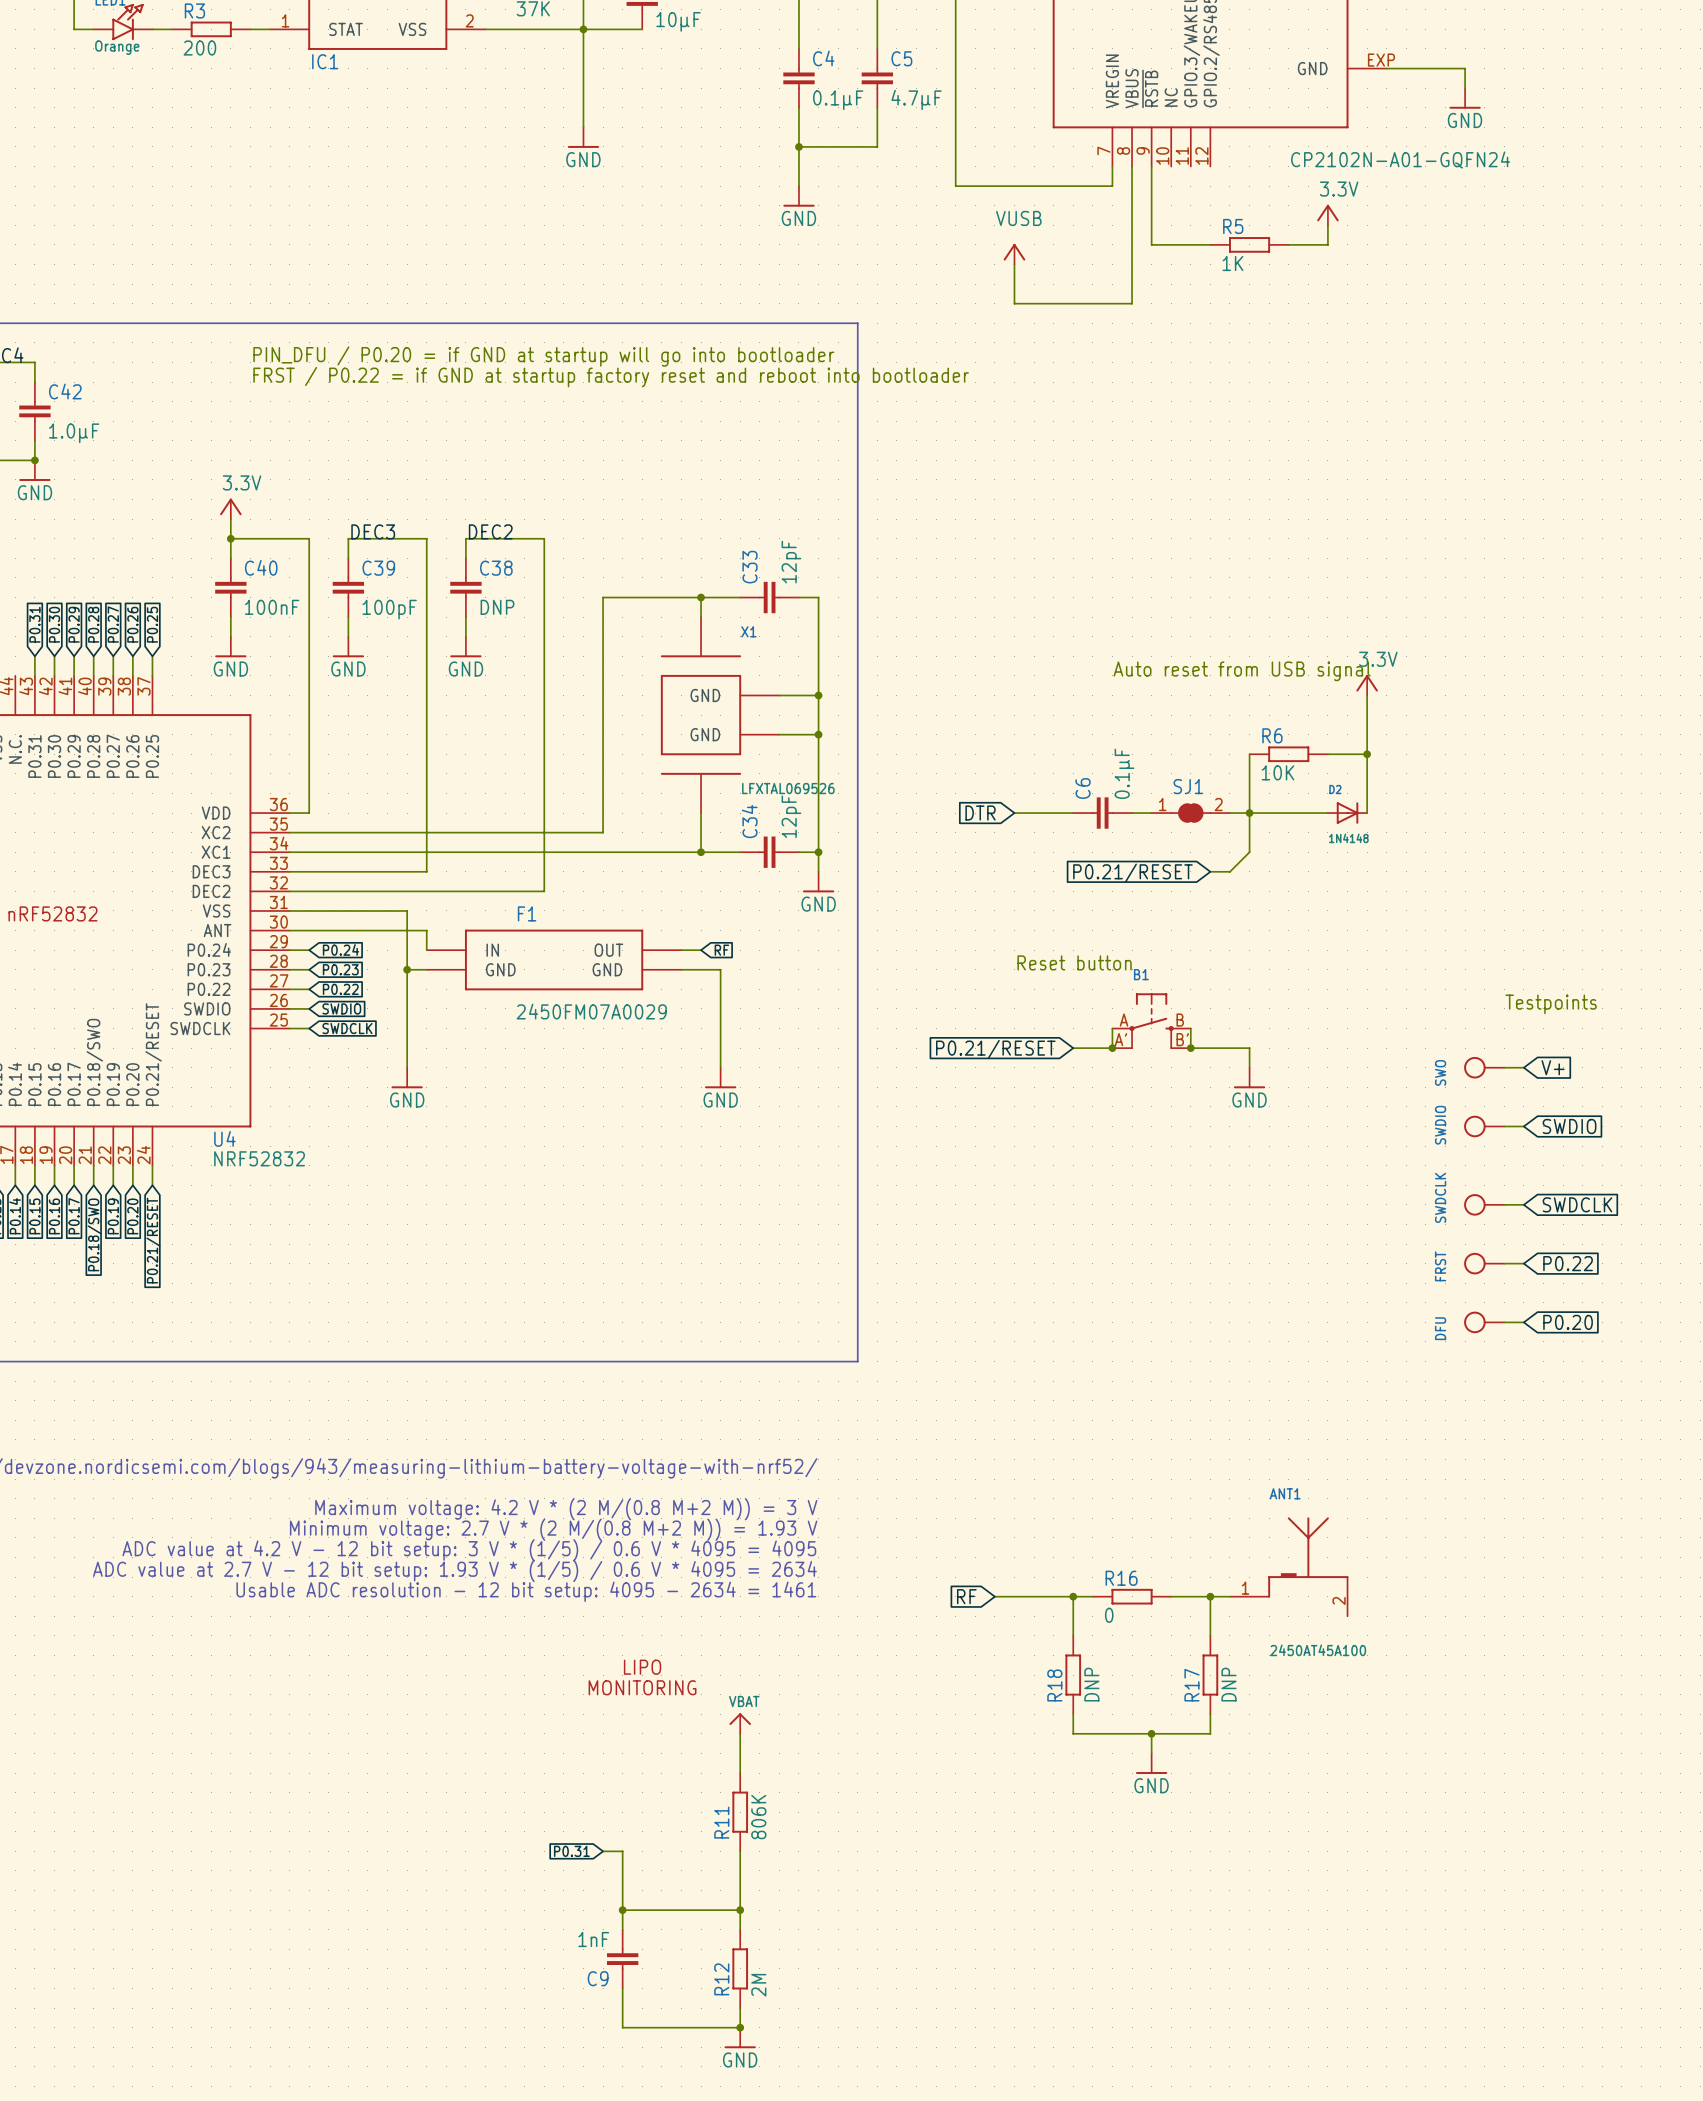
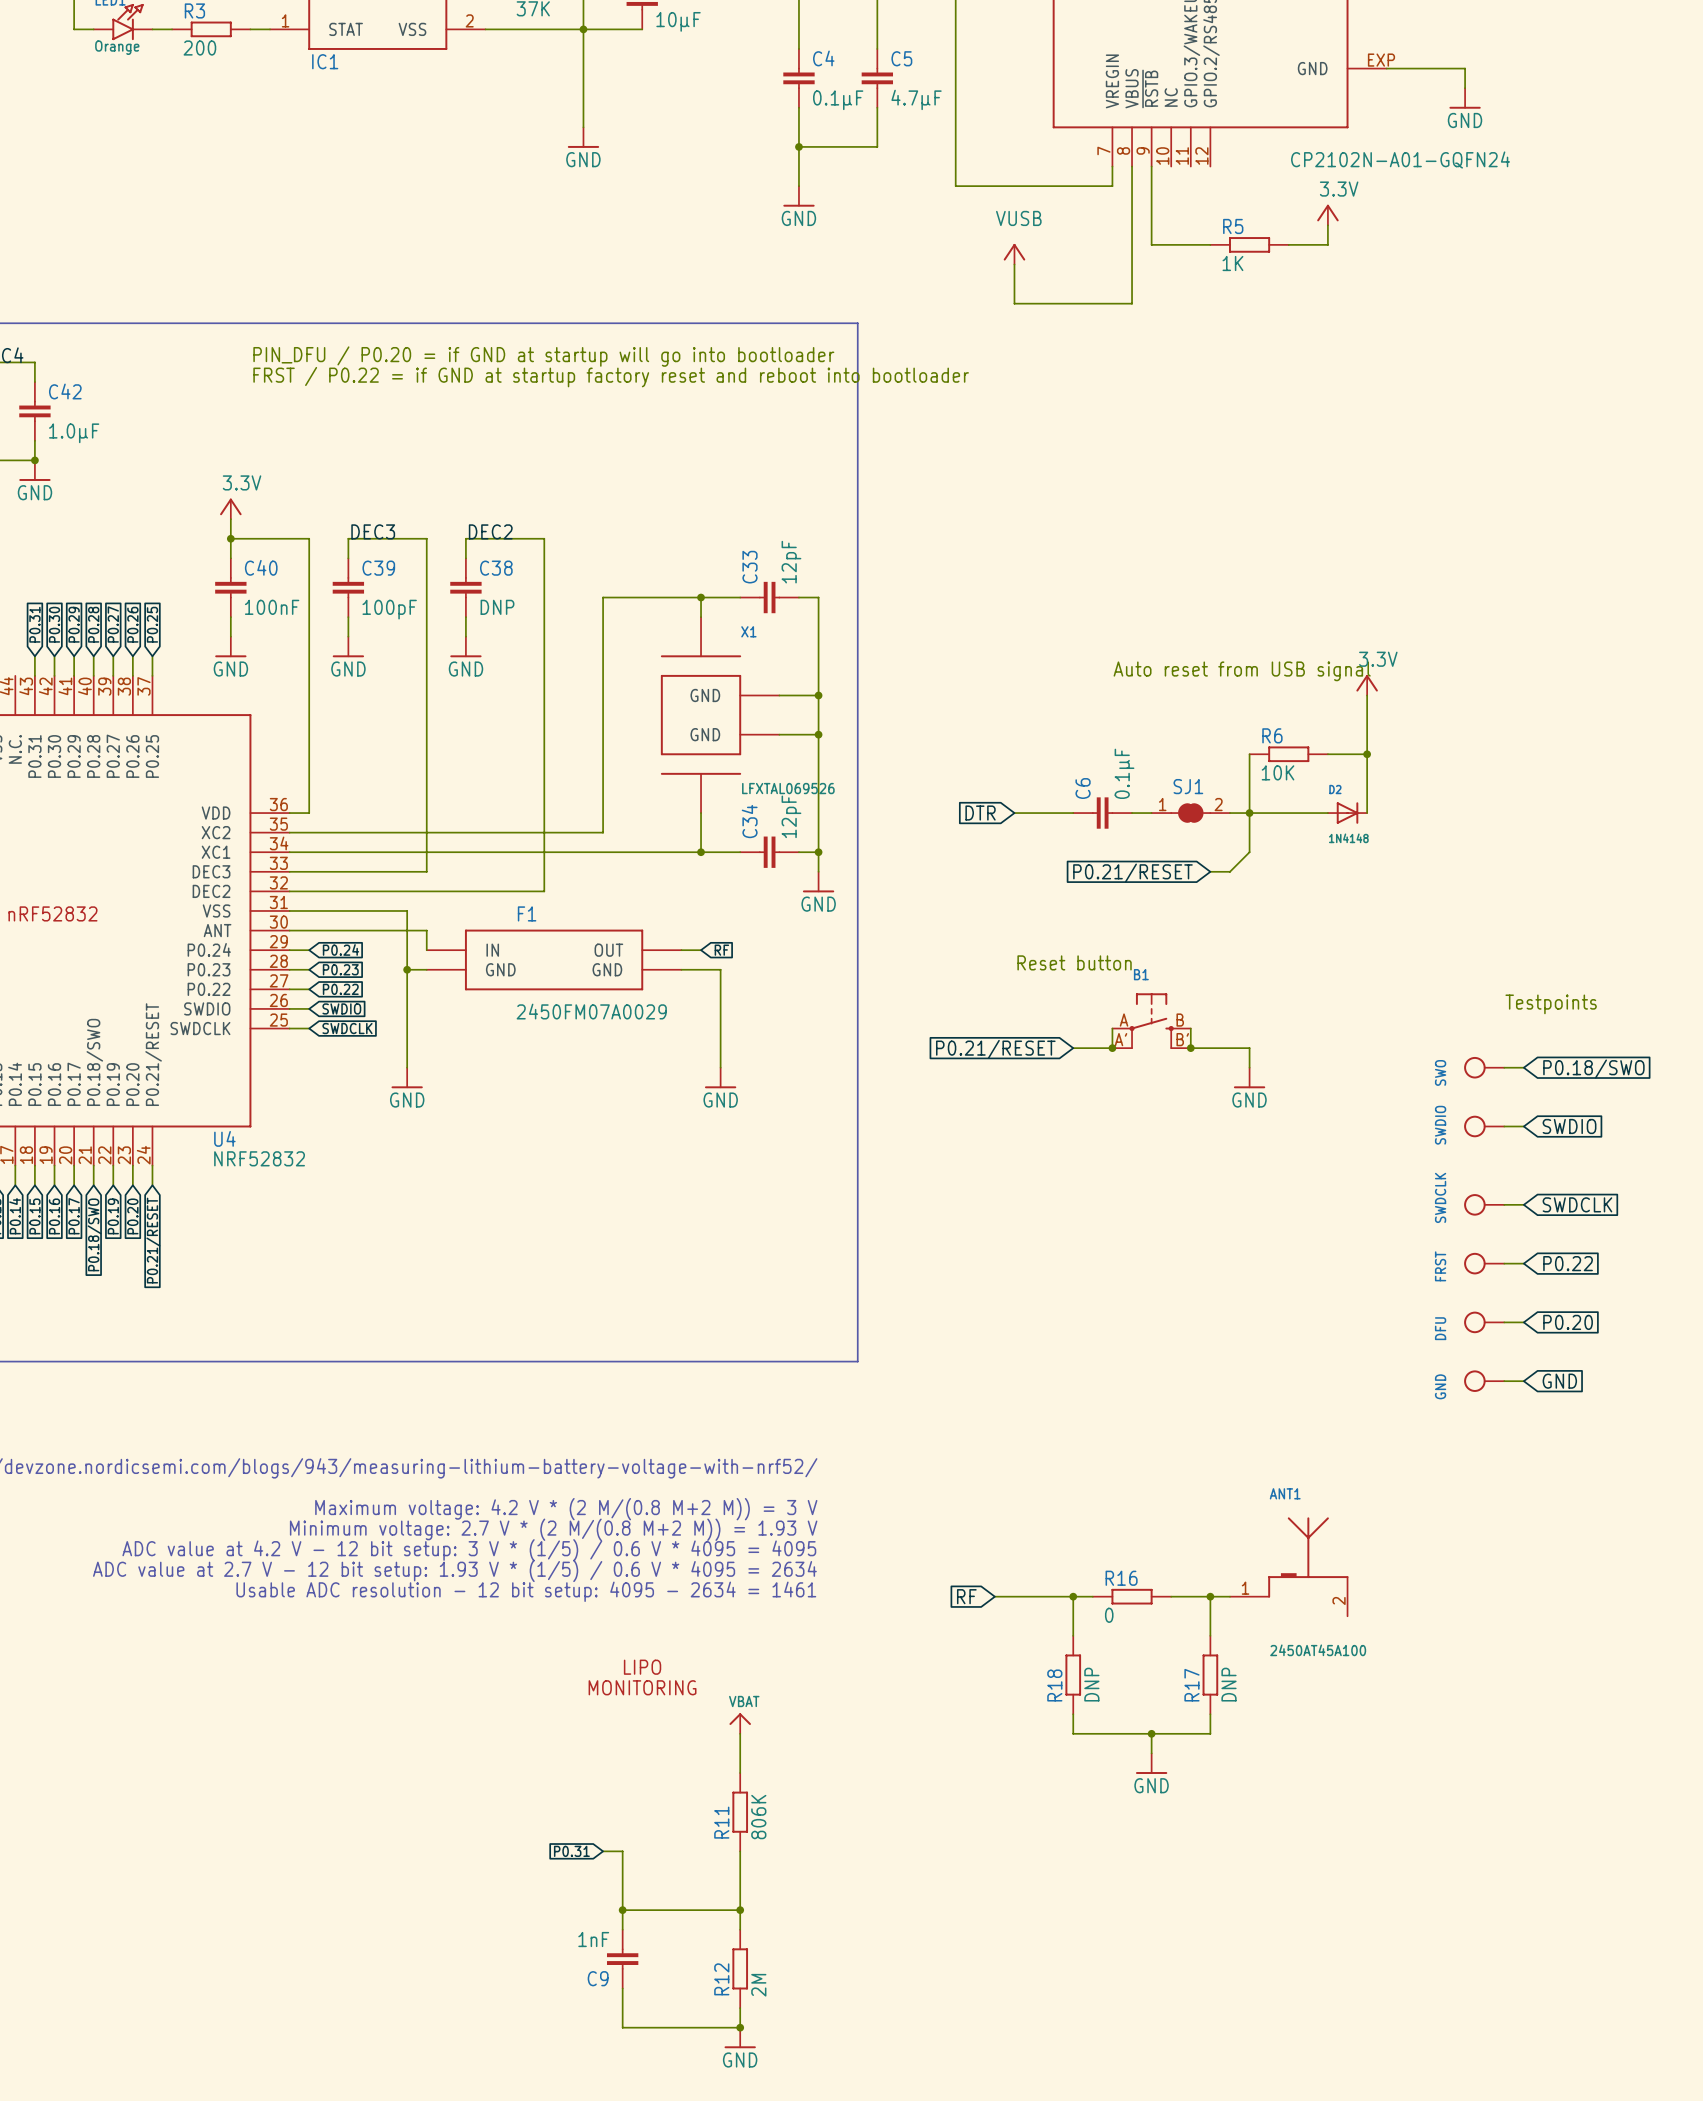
global label: V+ (1553, 1067) -> P0.18/SWO (1593, 1069)
GND: none -> (1484, 1381)
wire: none -> (1504, 1381) (1523, 1381)
global label: none -> GND (1559, 1381)

